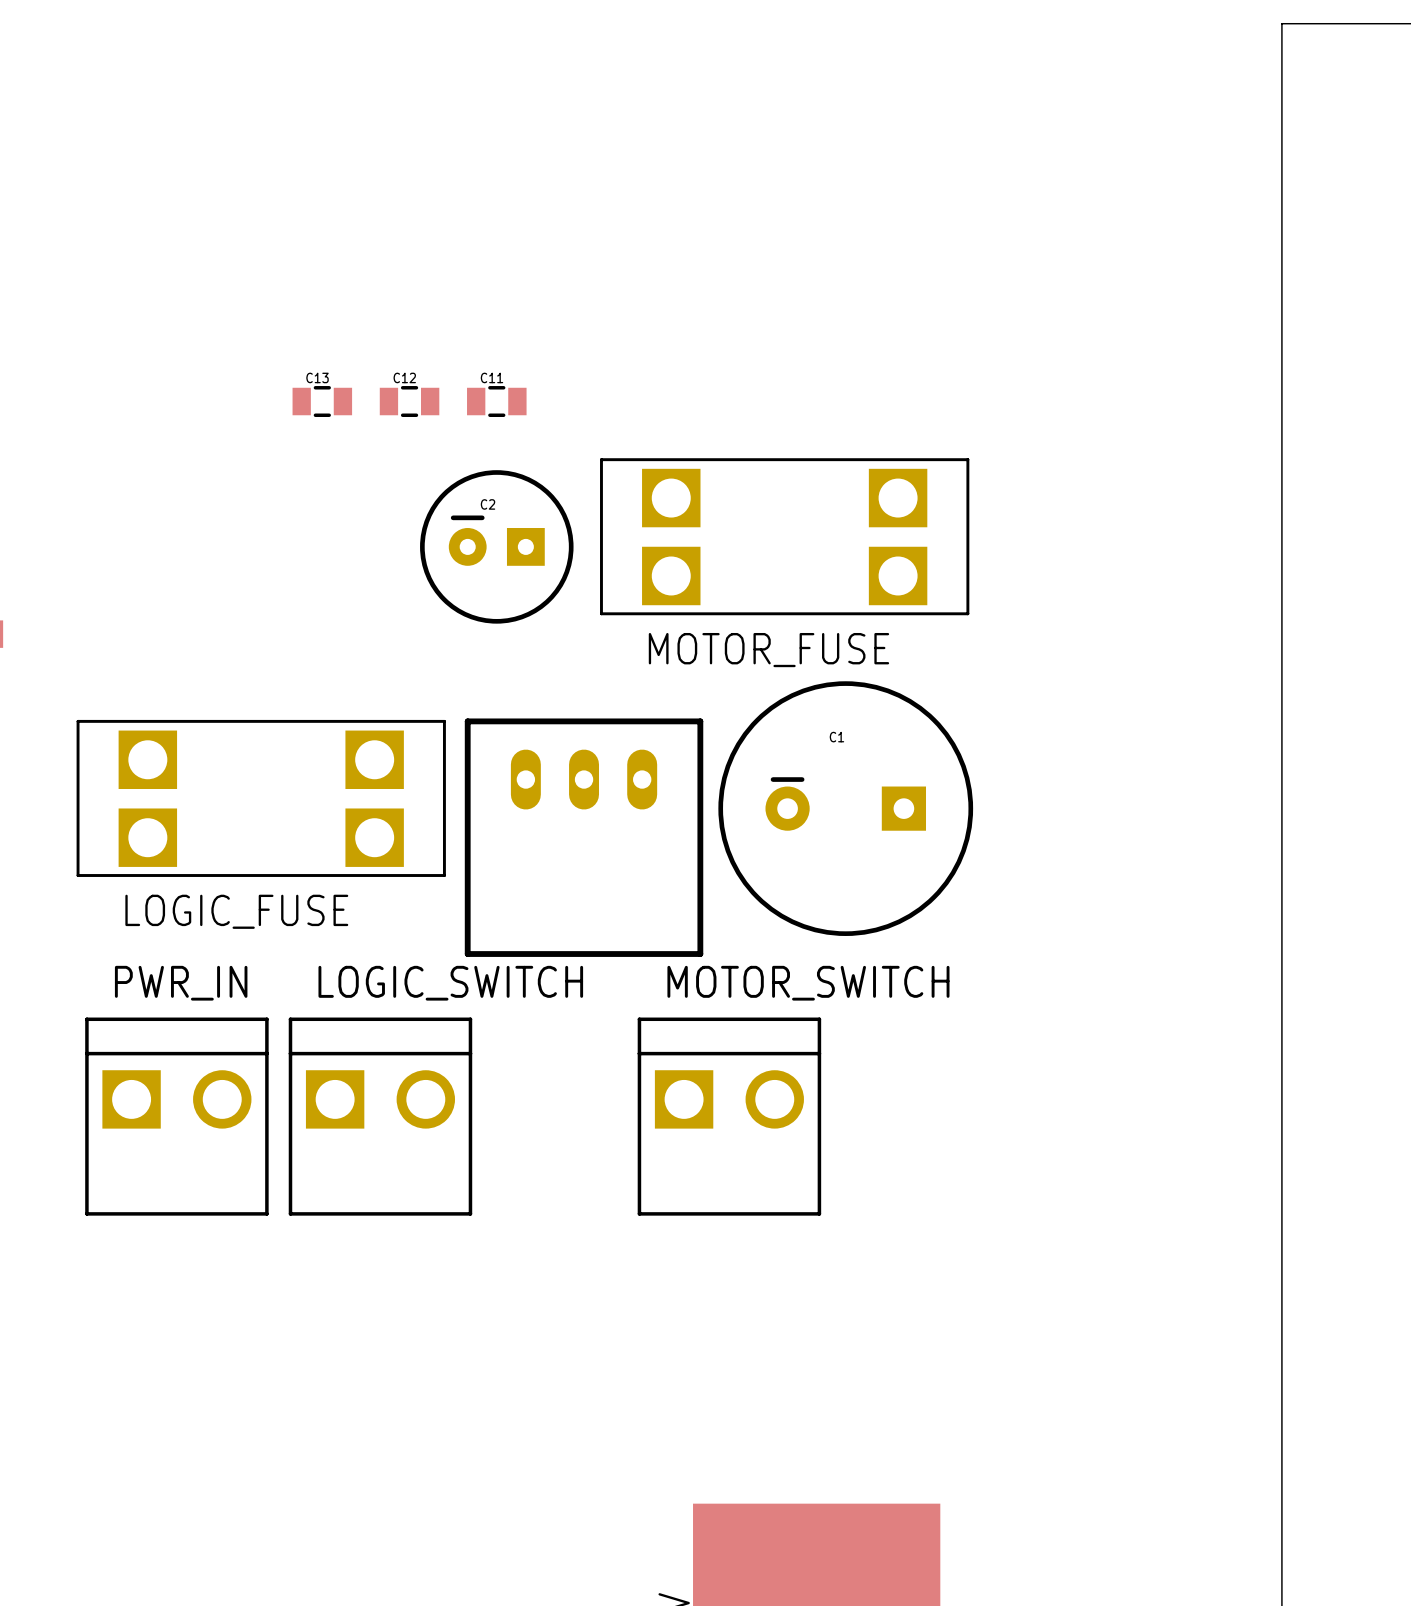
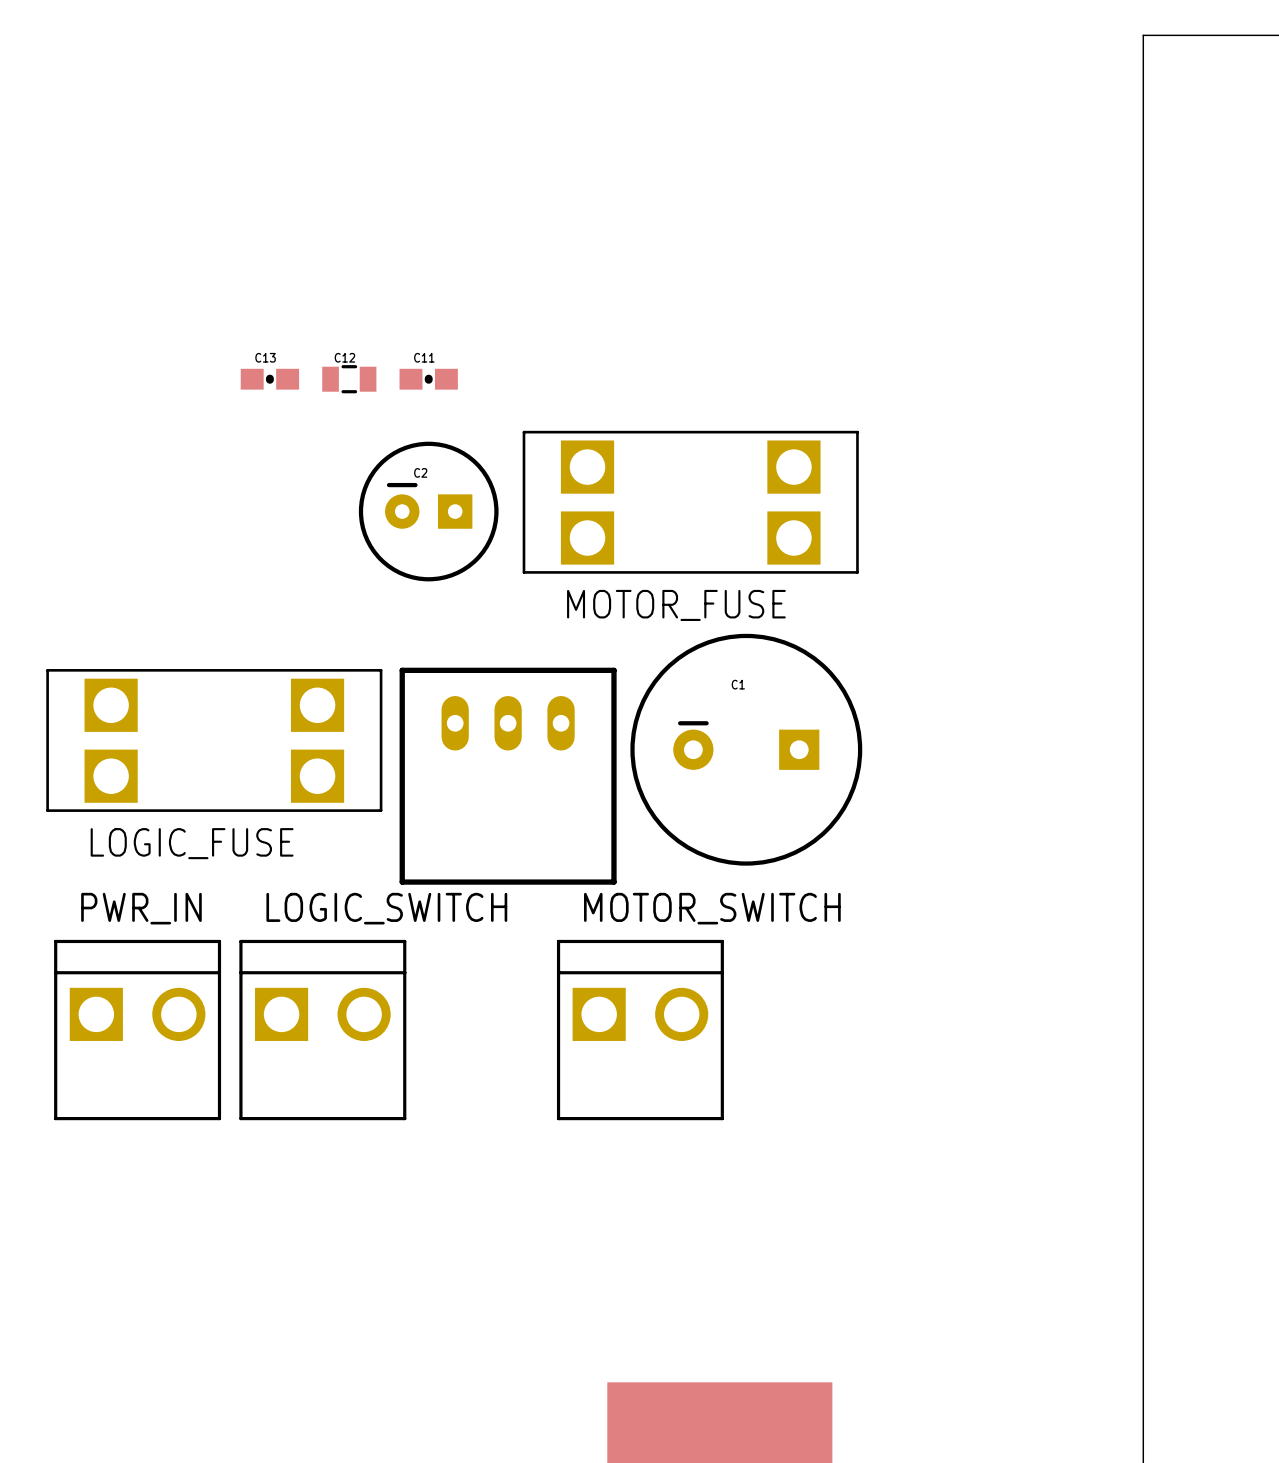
C13 footprint: [292, 386, 353, 417] -> [240, 368, 300, 390]
C11 footprint: [467, 386, 527, 417] -> [399, 368, 458, 390]

